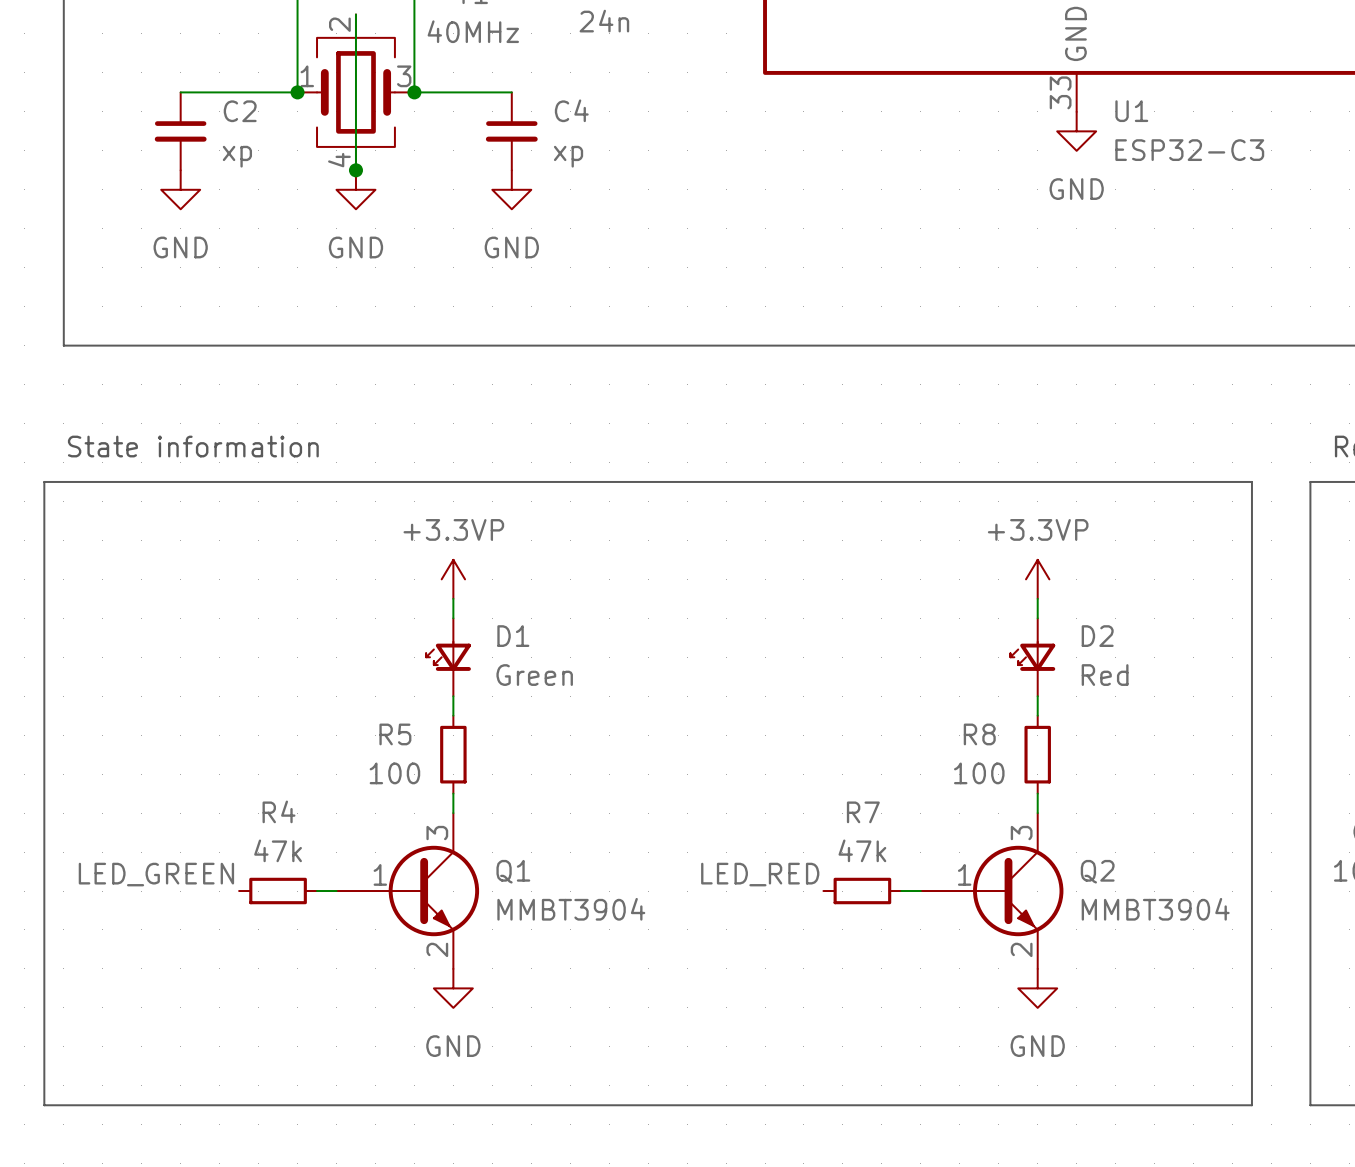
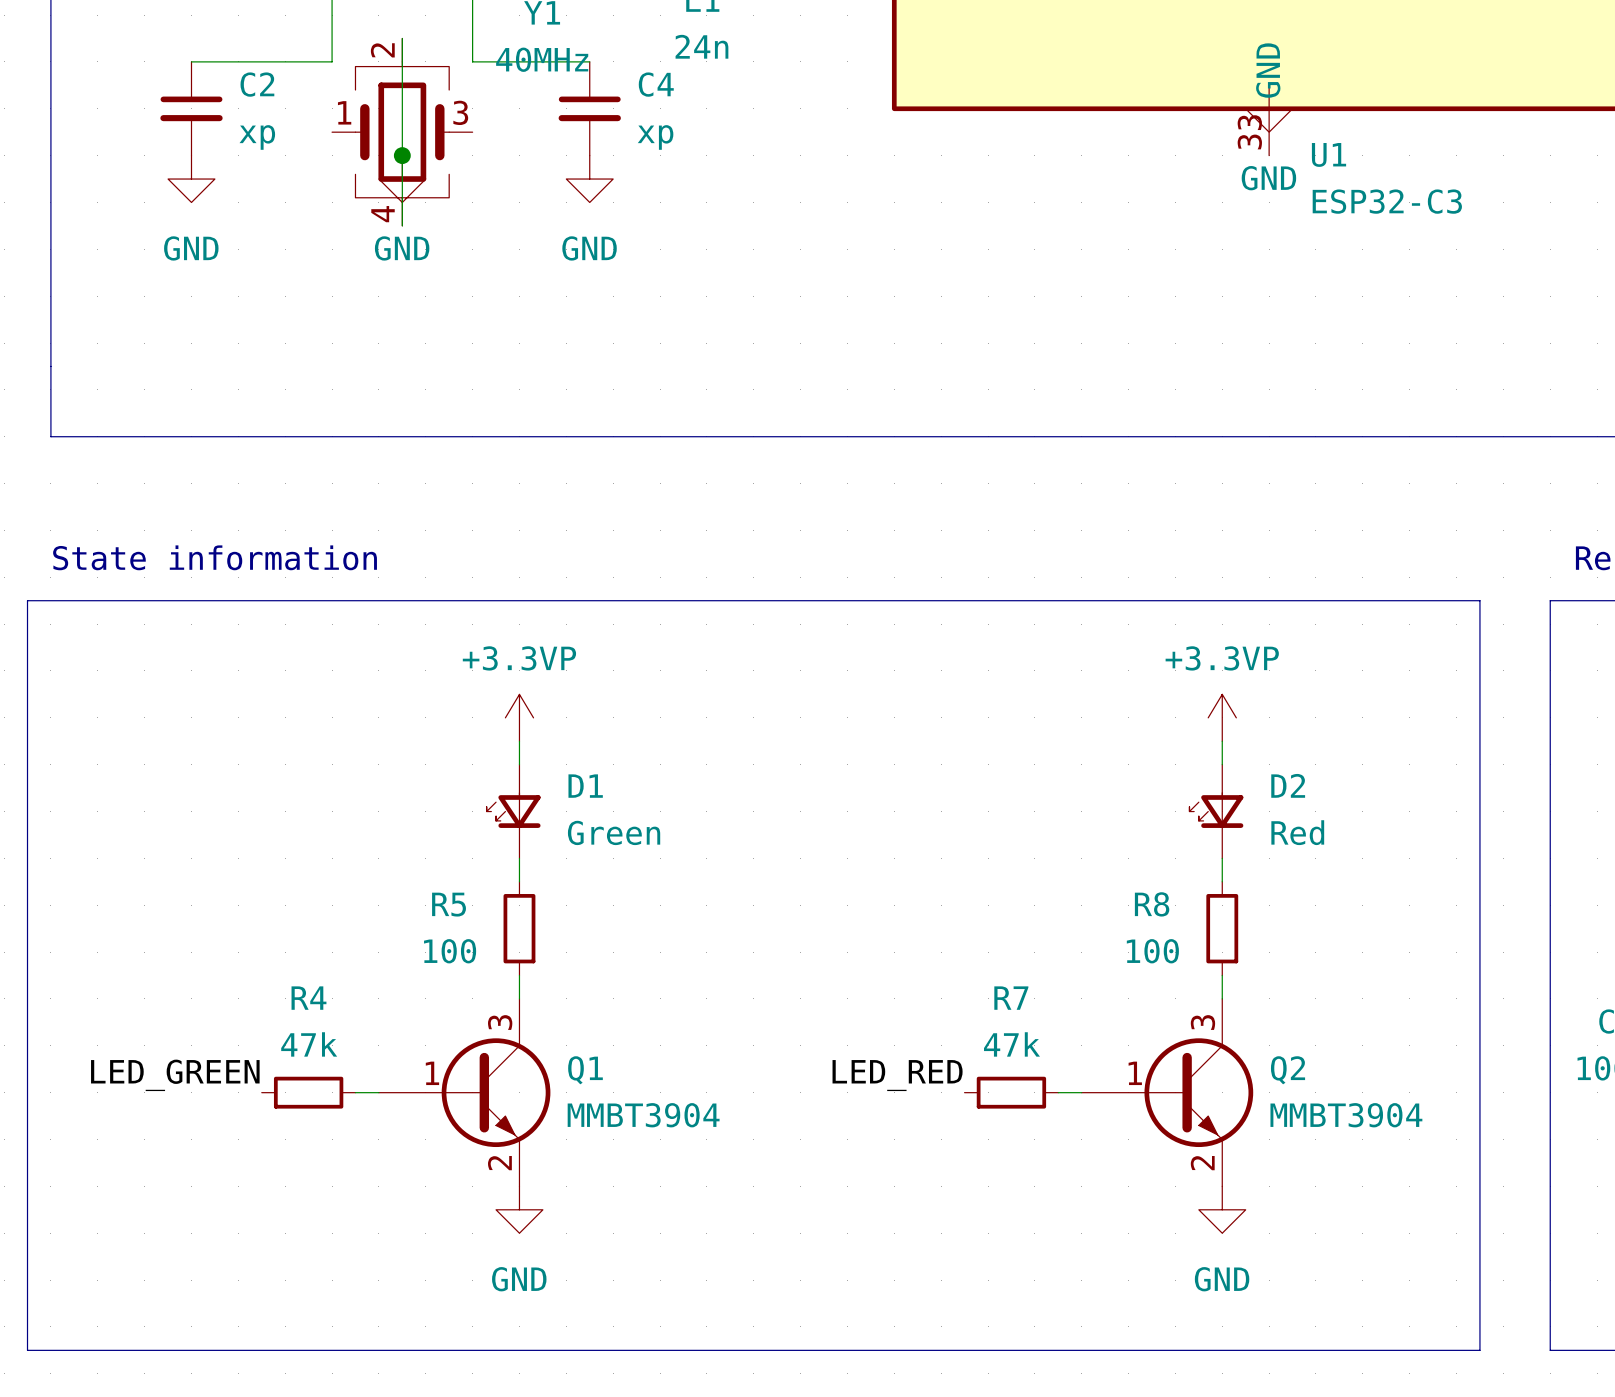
wire: (297, 33) (297, 92) (180, 92) -> (332, 61) (191, 61)
wire: (414, 33) (414, 92) (511, 92) -> (472, 61) (589, 61)
junction: (297, 92) -> none
junction: (414, 92) -> none
junction: none -> (402, 155)
C2 position: (180, 131) -> (191, 108)
C4 position: (511, 131) -> (589, 108)
power symbol position: GND (1076, 131) -> GND (1269, 108)
junction: (355, 170) -> none
power symbol position: GND (180, 189) -> GND (191, 179)
power symbol position: GND (355, 189) -> GND (402, 179)
power symbol position: GND (511, 189) -> GND (589, 179)

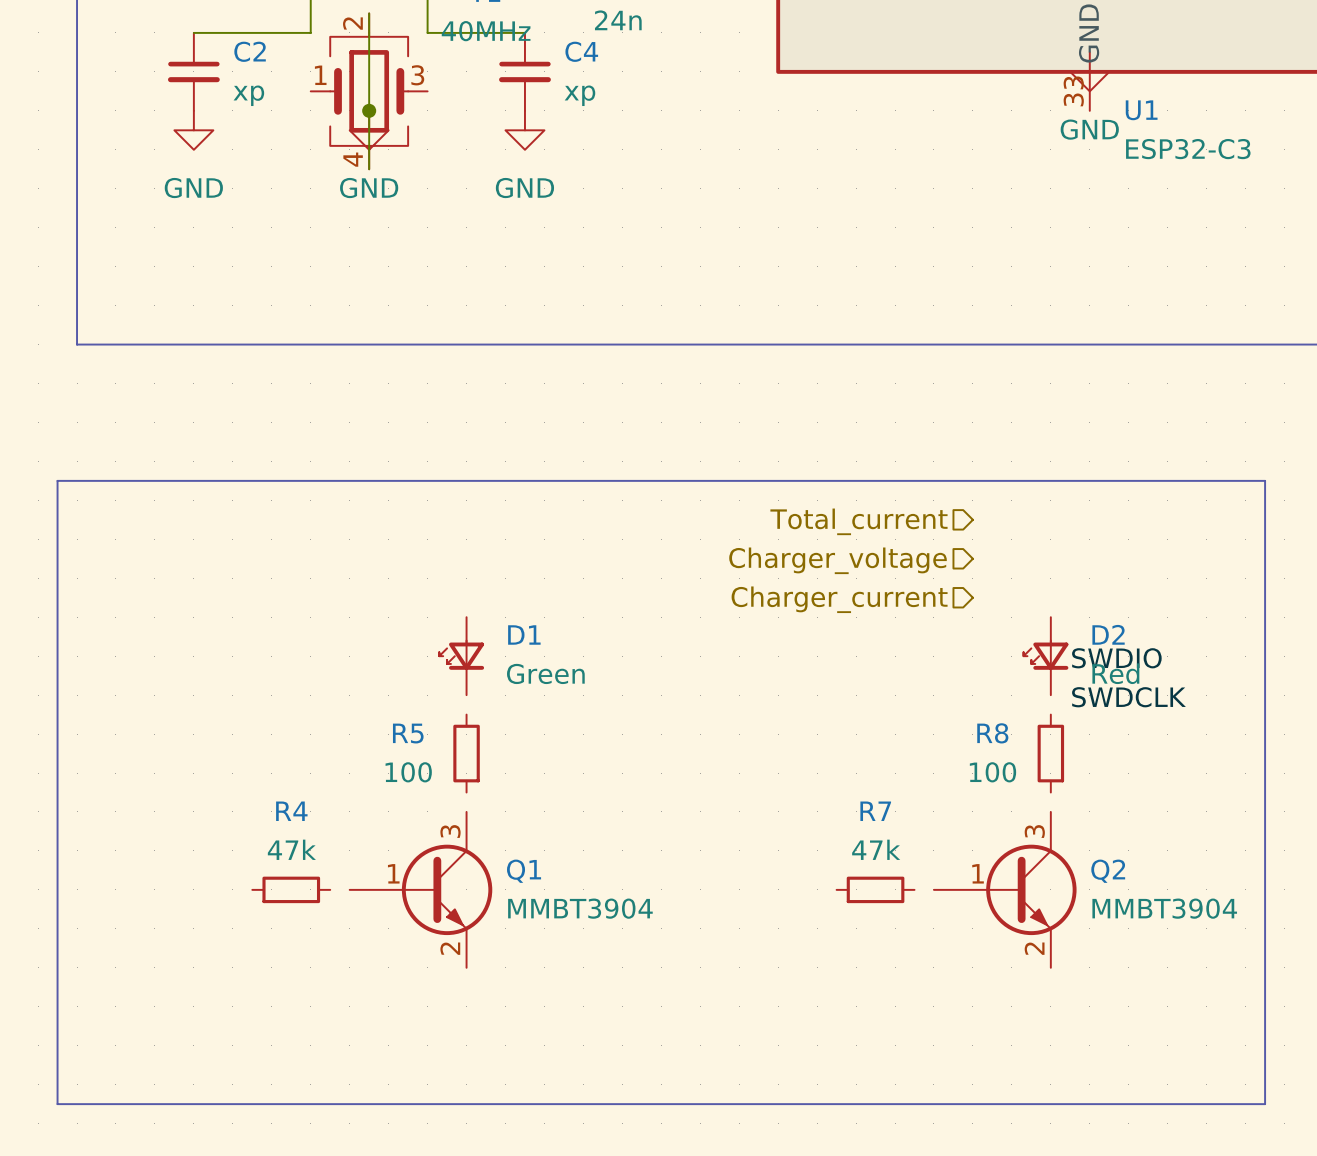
text: State information (215, 557) -> none
hierarchical label: none -> Total_current (858, 521)
hierarchical label: none -> Charger_voltage (838, 560)
power symbol: +3.3VP (519, 717) -> none
power symbol: +3.3VP (1222, 717) -> none
wire: (519, 741) (519, 764) -> none
wire: (1222, 741) (1222, 764) -> none
hierarchical label: none -> Charger_current (839, 599)
label: none -> SWDIO (1116, 658)
wire: (519, 858) (519, 881) -> none
wire: (1222, 858) (1222, 881) -> none
label: none -> SWDCLK (1128, 697)
wire: (519, 975) (519, 998) -> none
wire: (1222, 975) (1222, 998) -> none
label: LED_GREEN (175, 1075) -> none
label: LED_RED (897, 1075) -> none
wire: (355, 1092) (378, 1092) -> none
wire: (1058, 1092) (1081, 1092) -> none
power symbol: GND (519, 1209) -> none
power symbol: GND (1222, 1209) -> none

